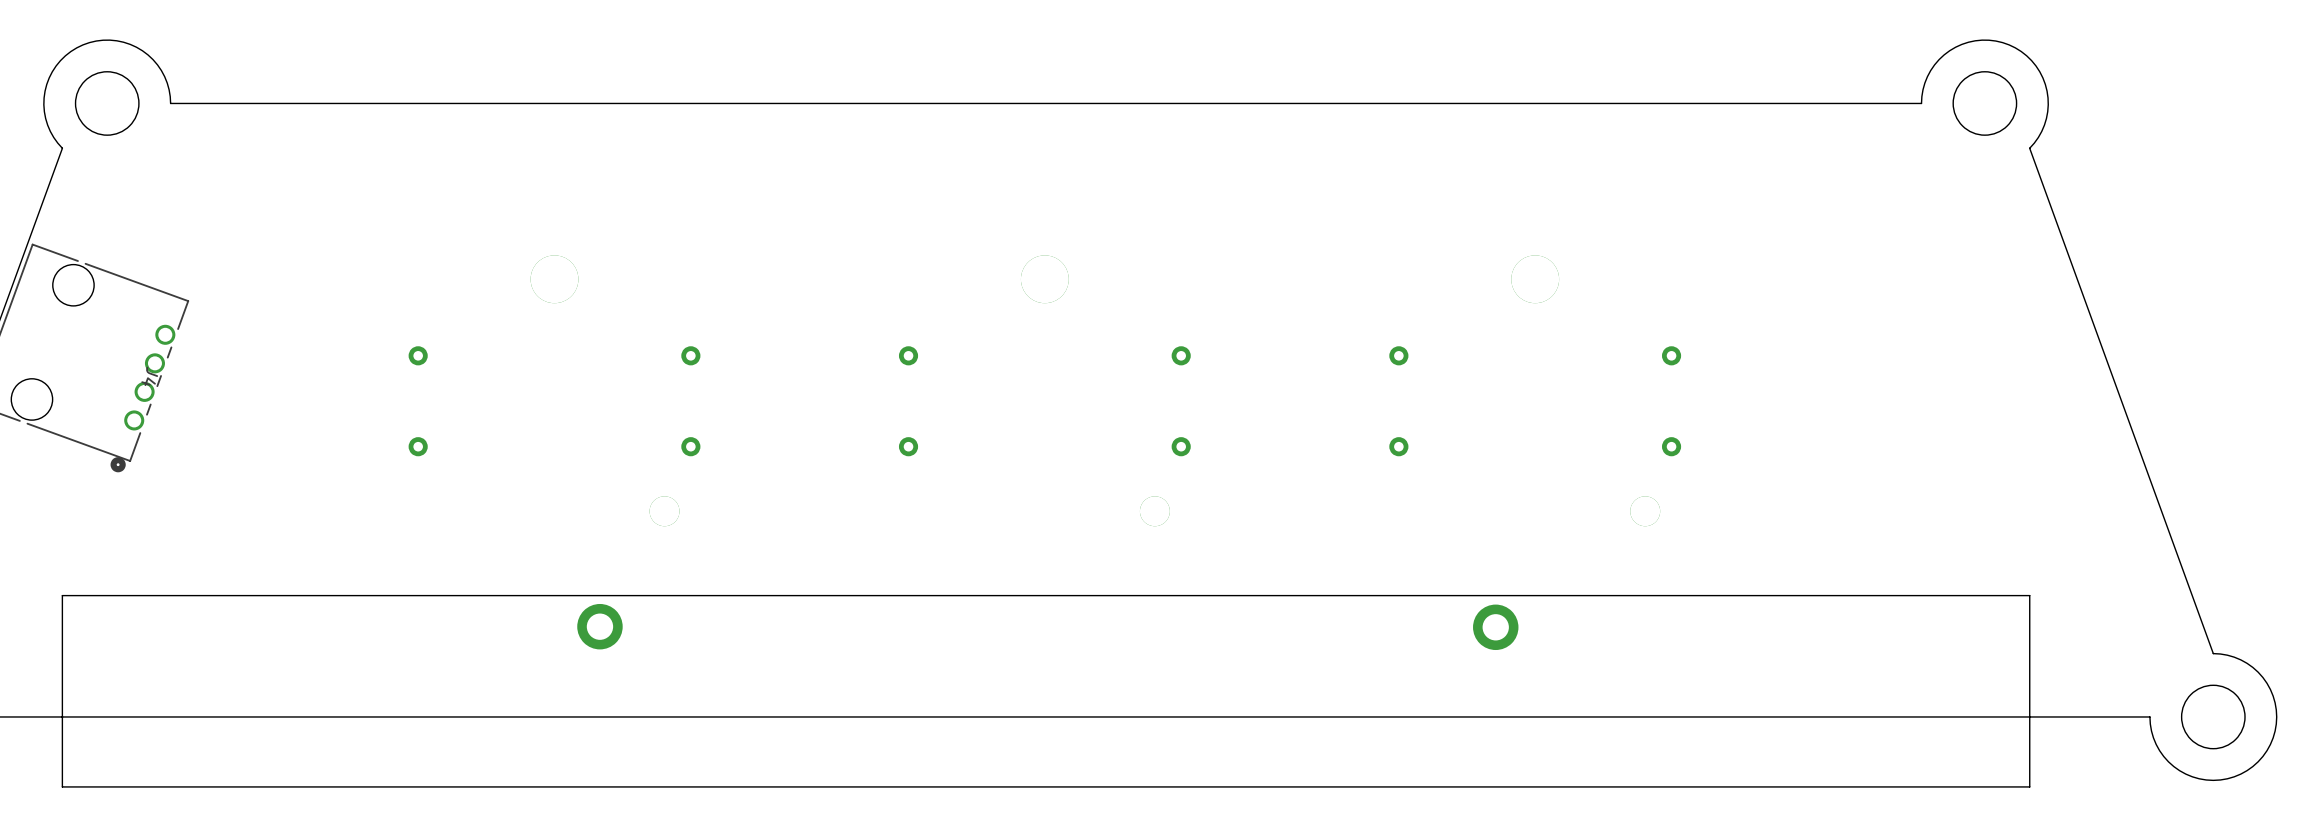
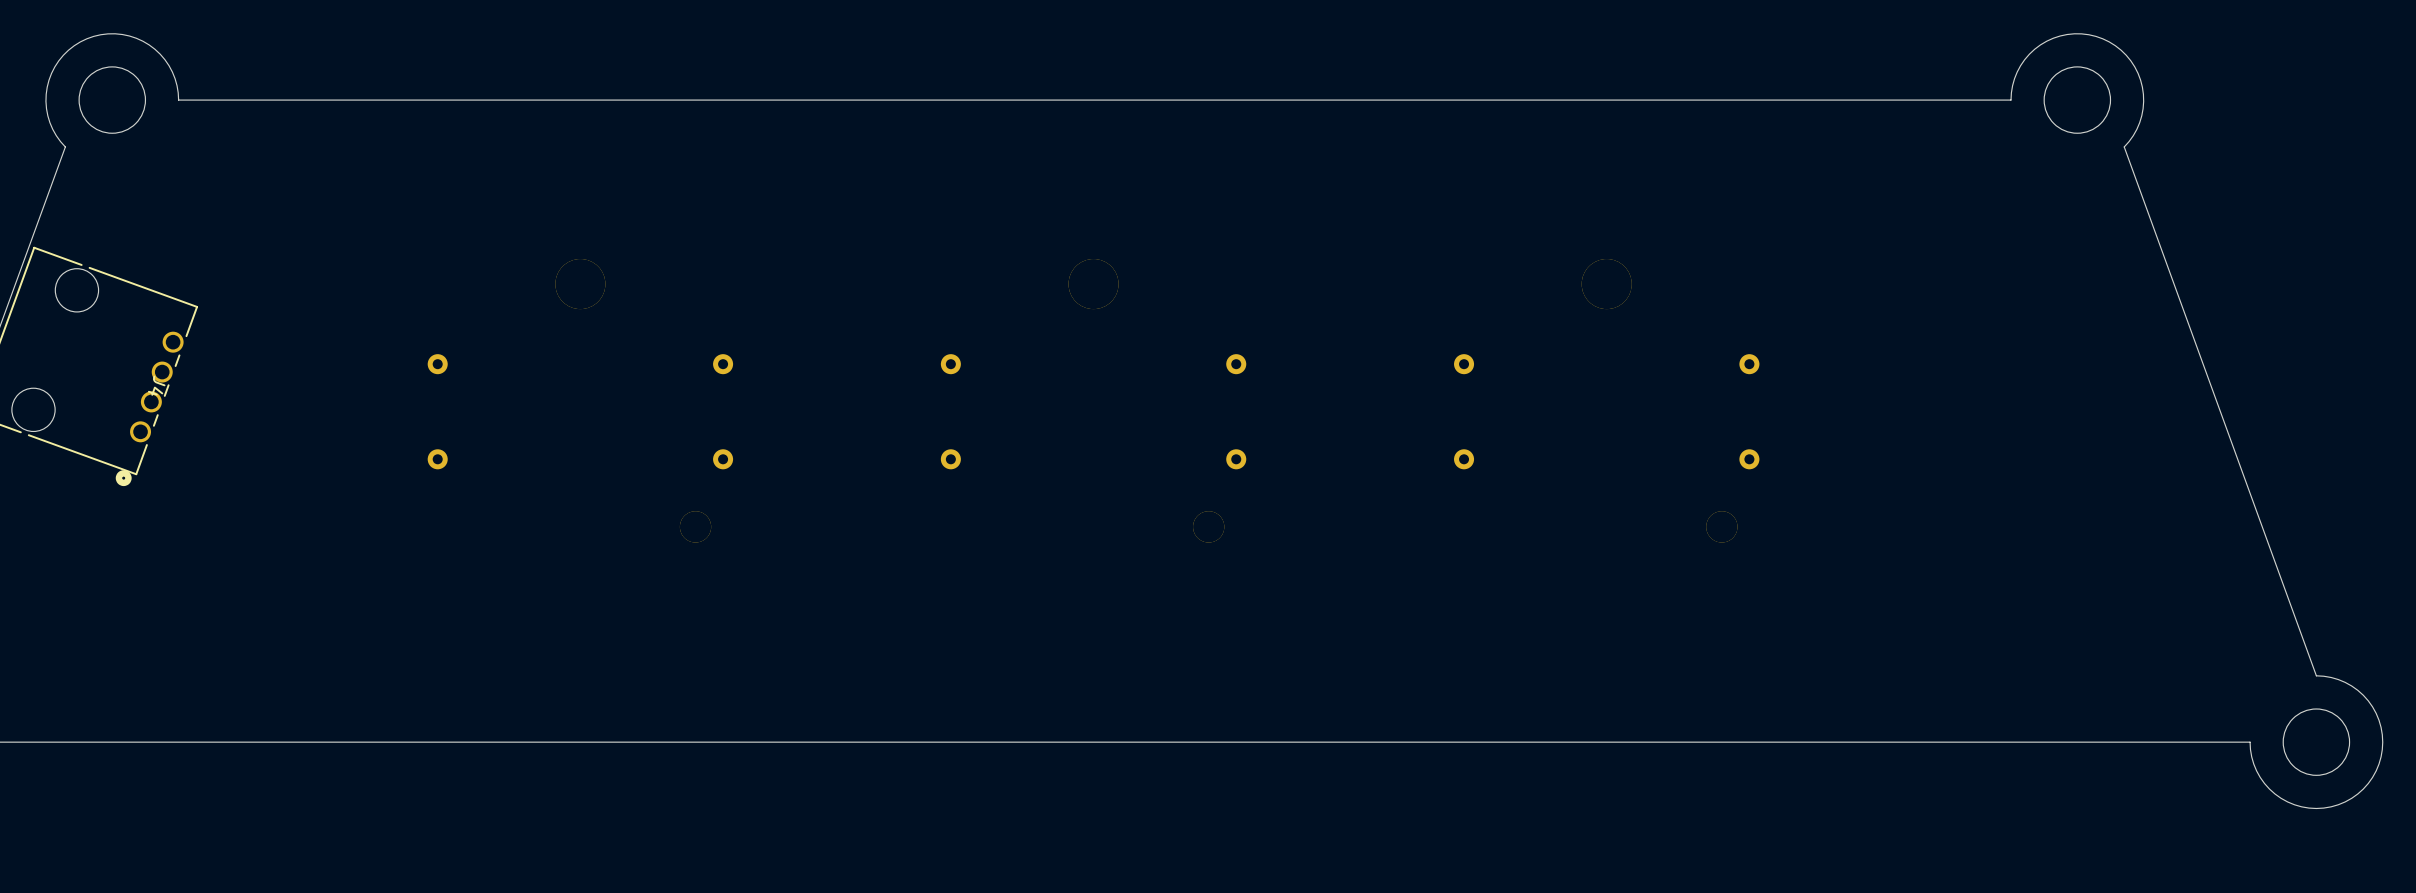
part: (1046, 691) -> none

